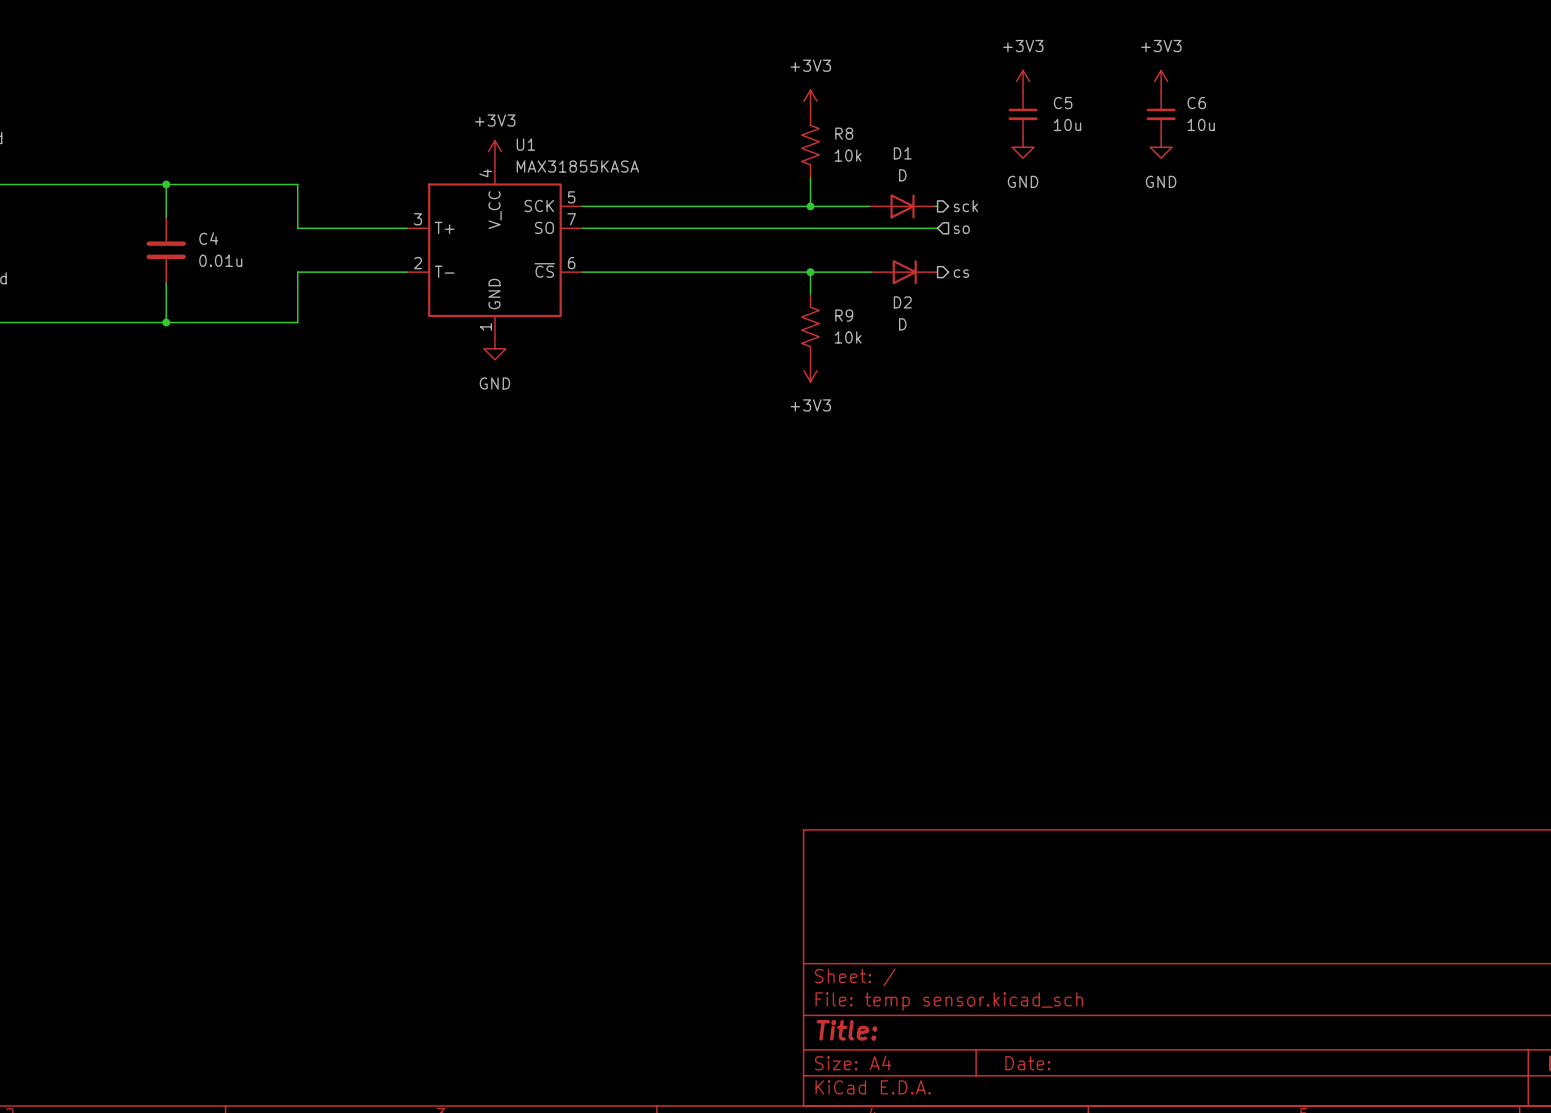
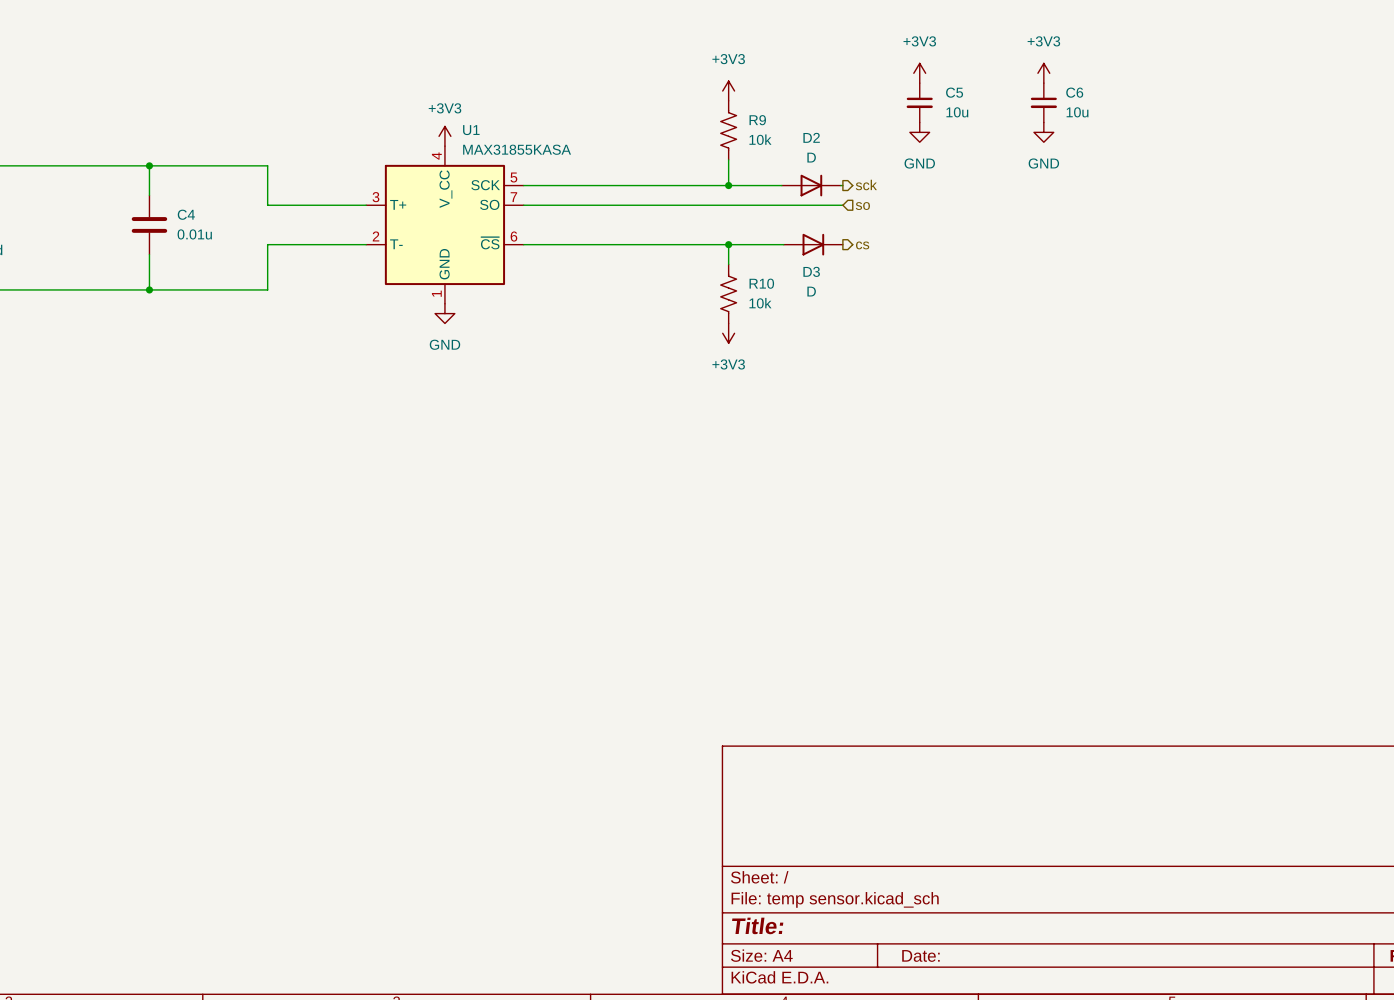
R8 name: R8 (844, 133) -> R9 (757, 120)
D1 name: D1 (902, 153) -> D2 (811, 137)
D2 name: D2 (902, 302) -> D3 (811, 271)
R9 name: R9 (844, 315) -> R10 (761, 283)

